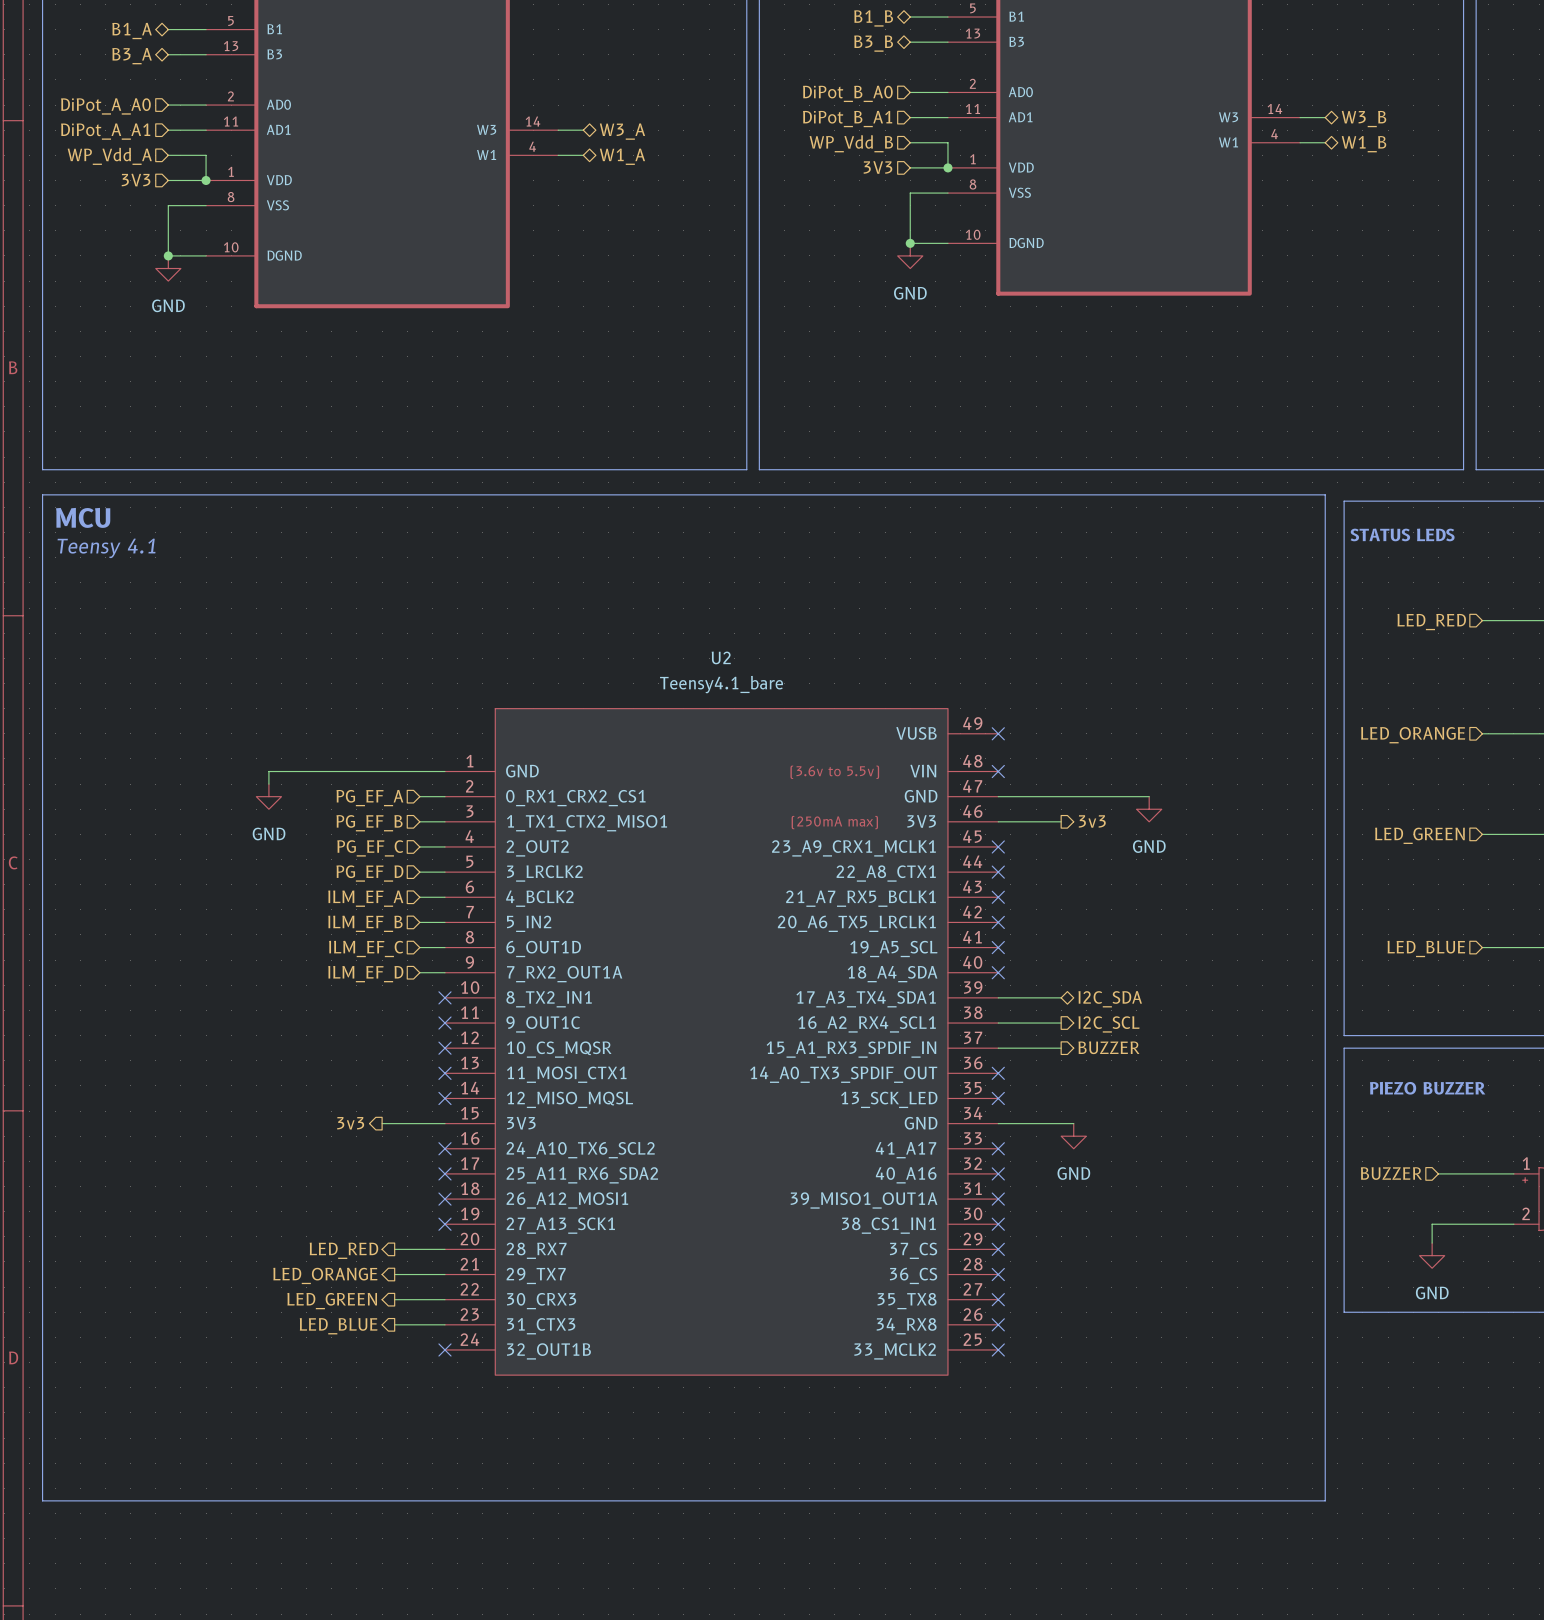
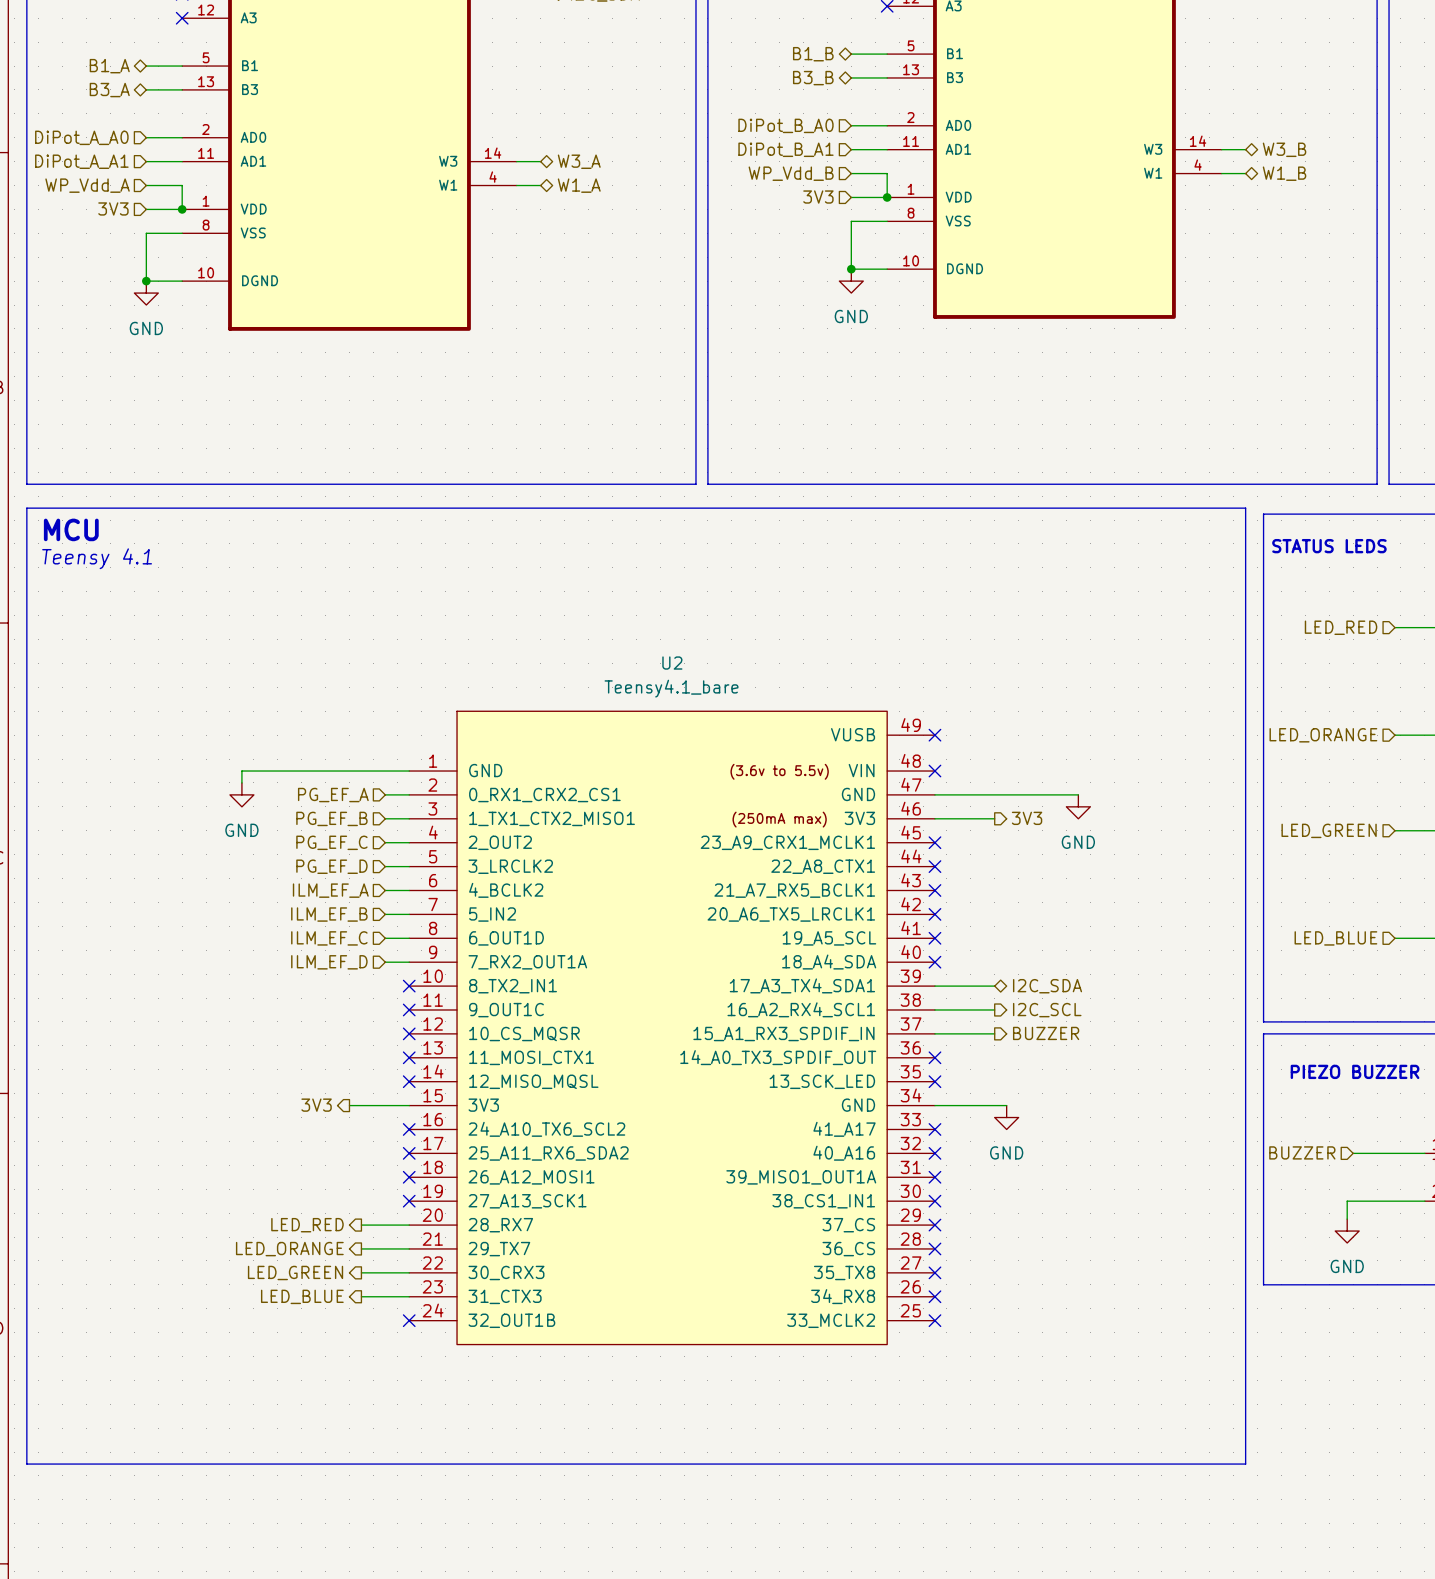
hierarchical label: 3v3 (1092, 821) -> 3V3 (1027, 818)
hierarchical label: 3v3 (350, 1123) -> 3V3 (316, 1105)

